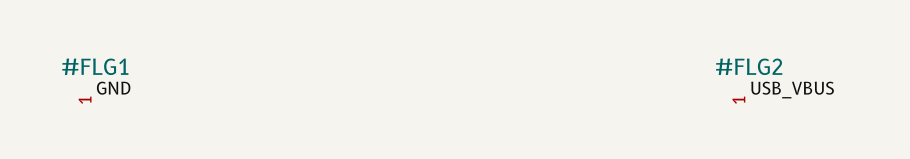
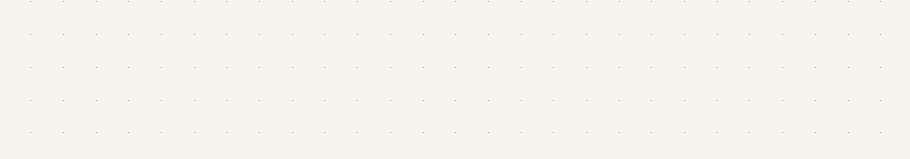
#FLG1: (95, 81) -> none
#FLG2: (749, 81) -> none
label: GND (113, 88) -> none
label: USB_VBUS (792, 90) -> none

